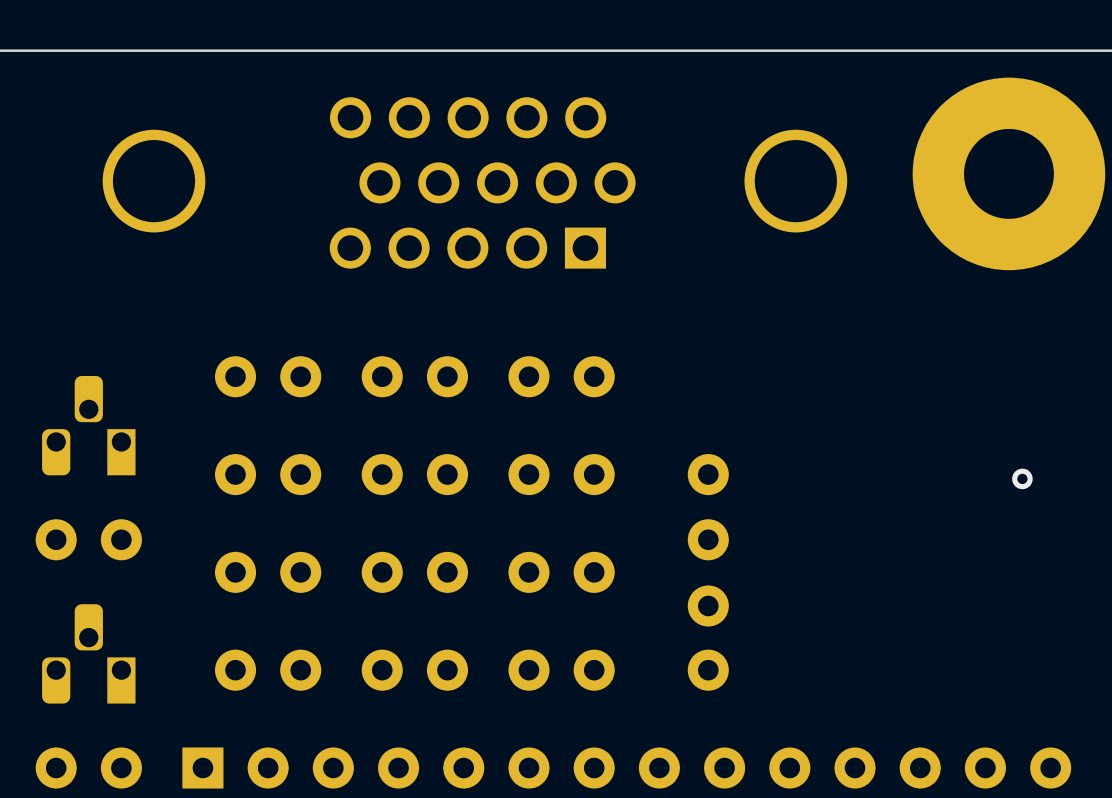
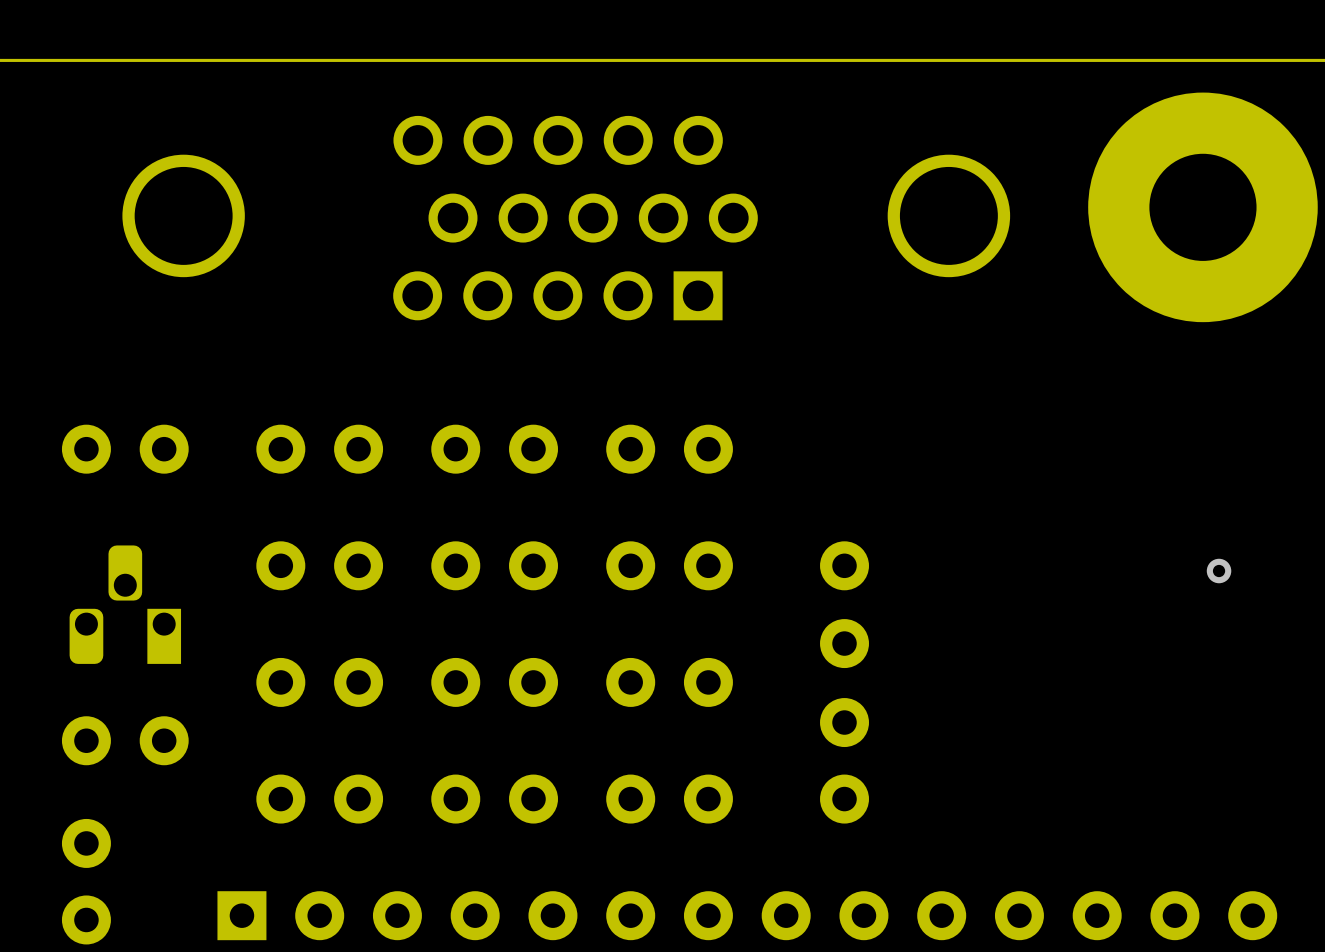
part: none -> (125, 449)
part: (88, 425) -> none
part: none -> (125, 604)
part: (88, 539) -> none
part: none -> (125, 740)
part: (88, 653) -> none
part rotation: 0° (88, 768) -> 90° clockwise (86, 881)

